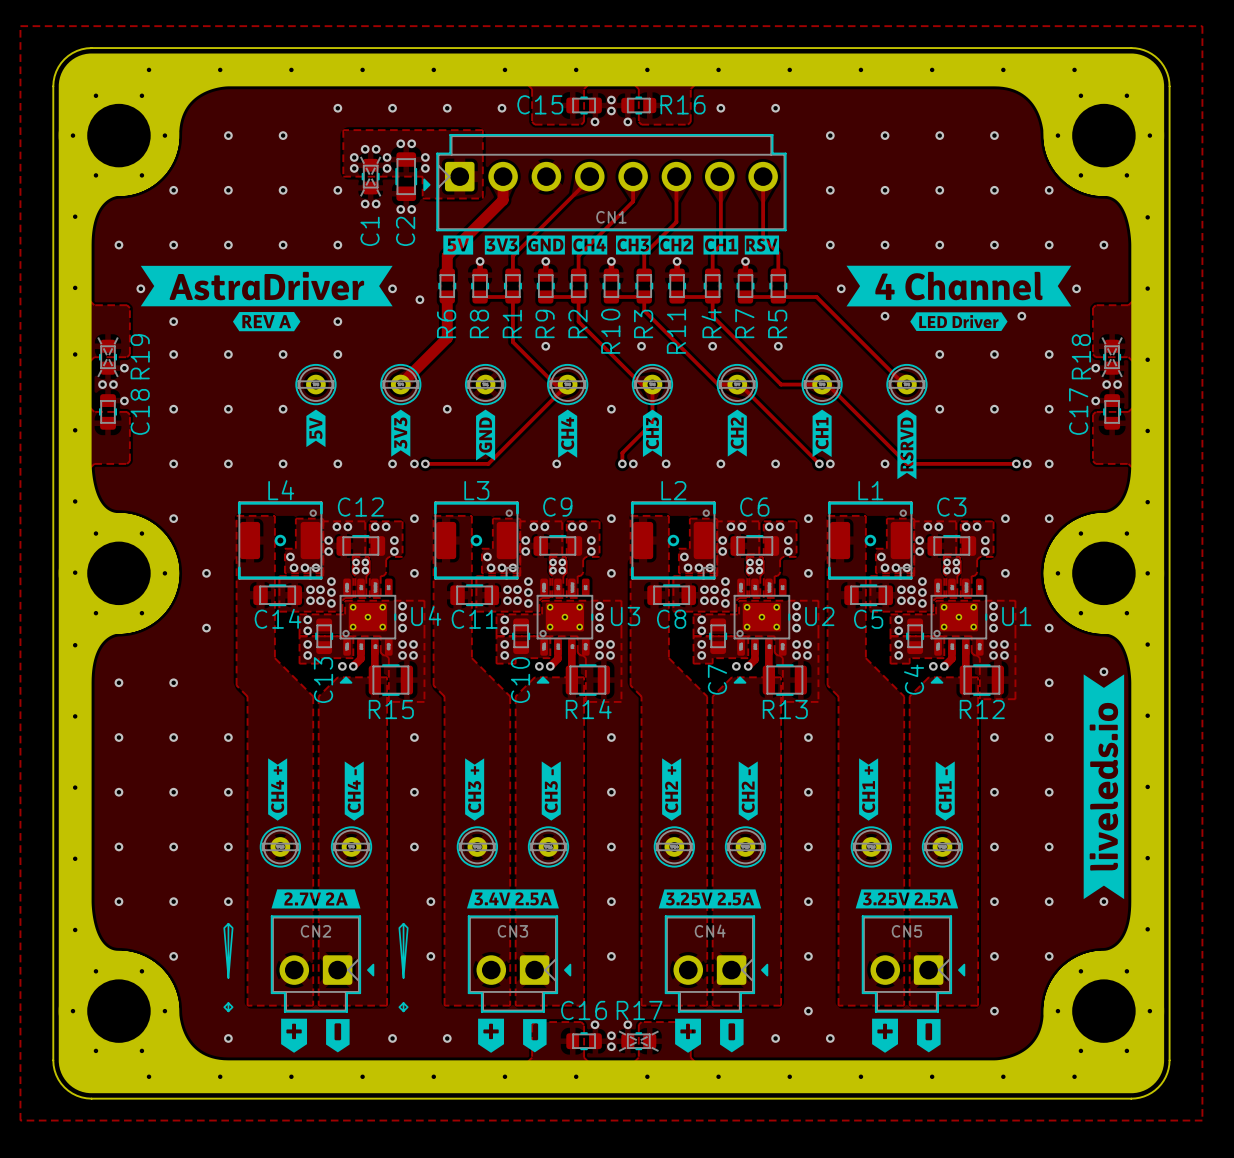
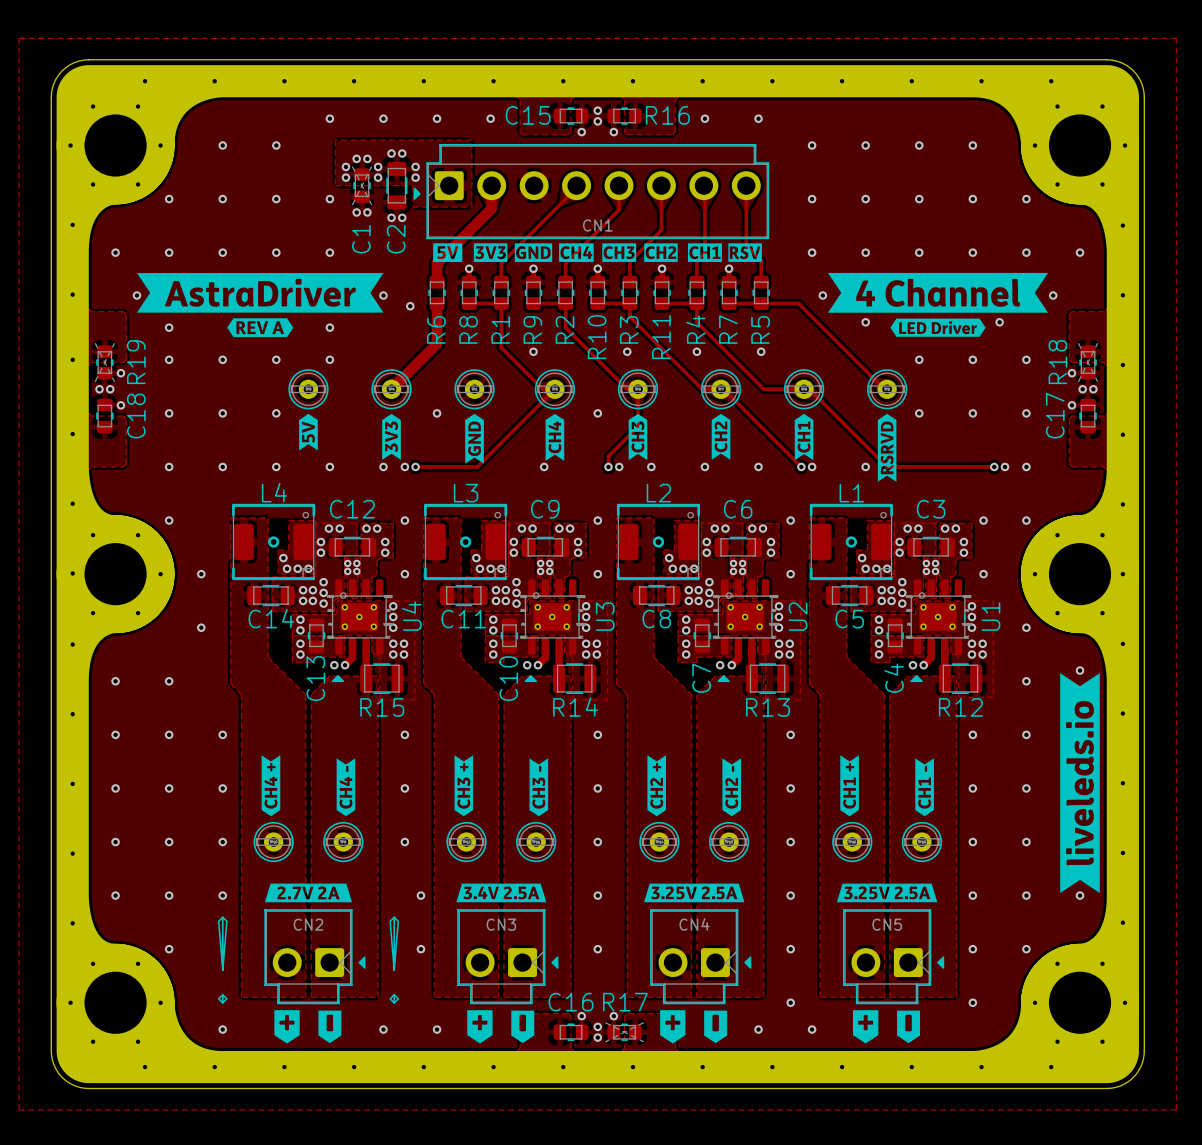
U4 footprint: [339, 578, 397, 684] -> [331, 579, 388, 683]
U3 footprint: [536, 578, 594, 684] -> [524, 579, 580, 683]
U2 footprint: [733, 578, 791, 684] -> [717, 579, 773, 683]
U1 footprint: [930, 578, 988, 684] -> [910, 579, 966, 683]

